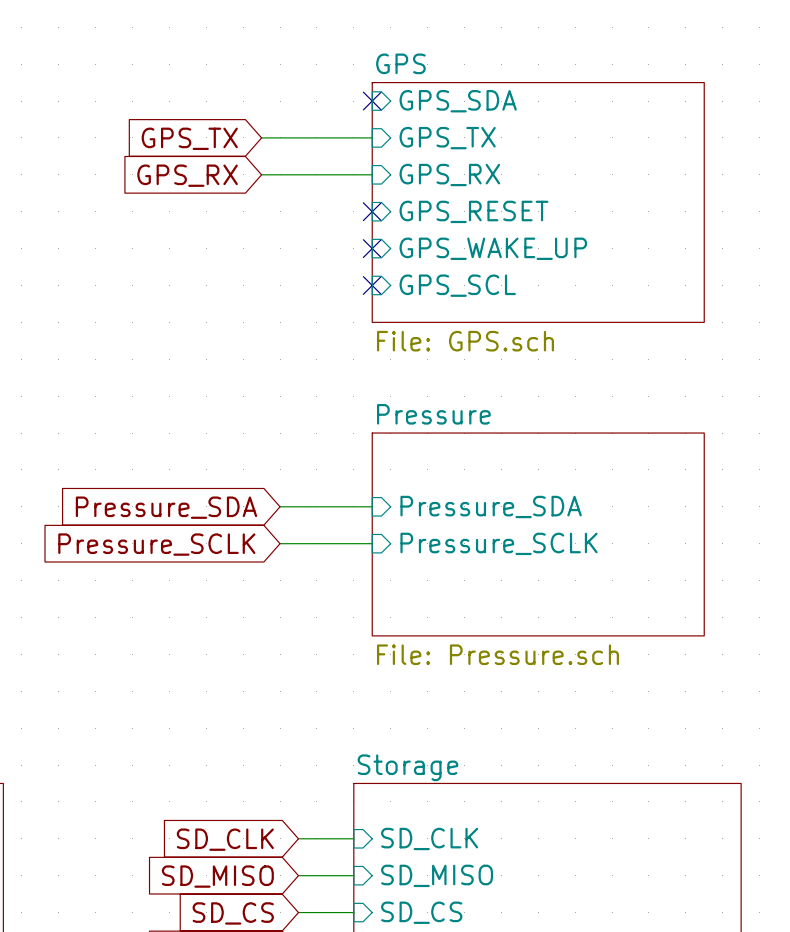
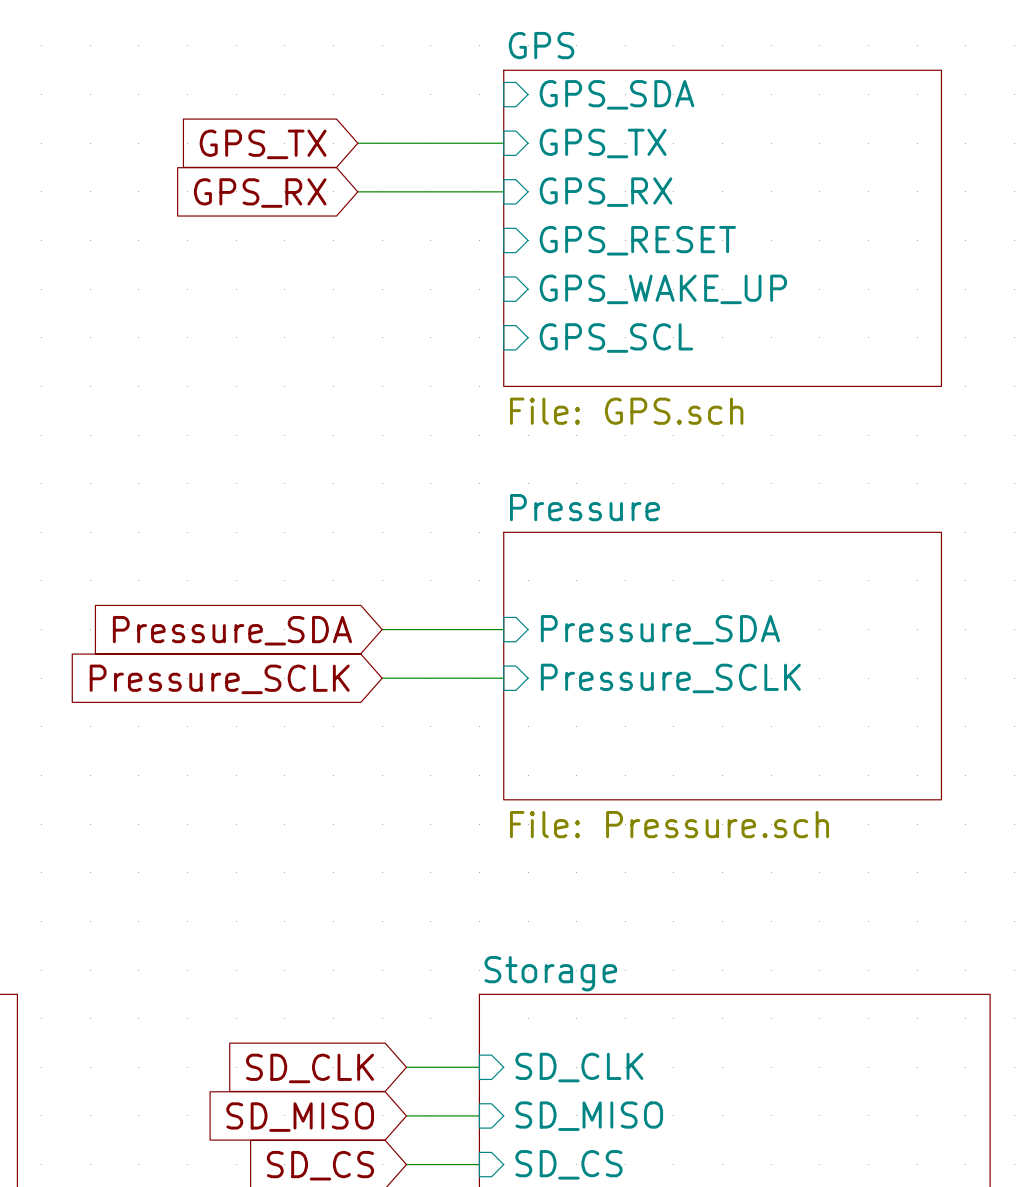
no-connect mark: (372, 101) -> none
no-connect mark: (372, 211) -> none
no-connect mark: (372, 248) -> none
no-connect mark: (372, 285) -> none

